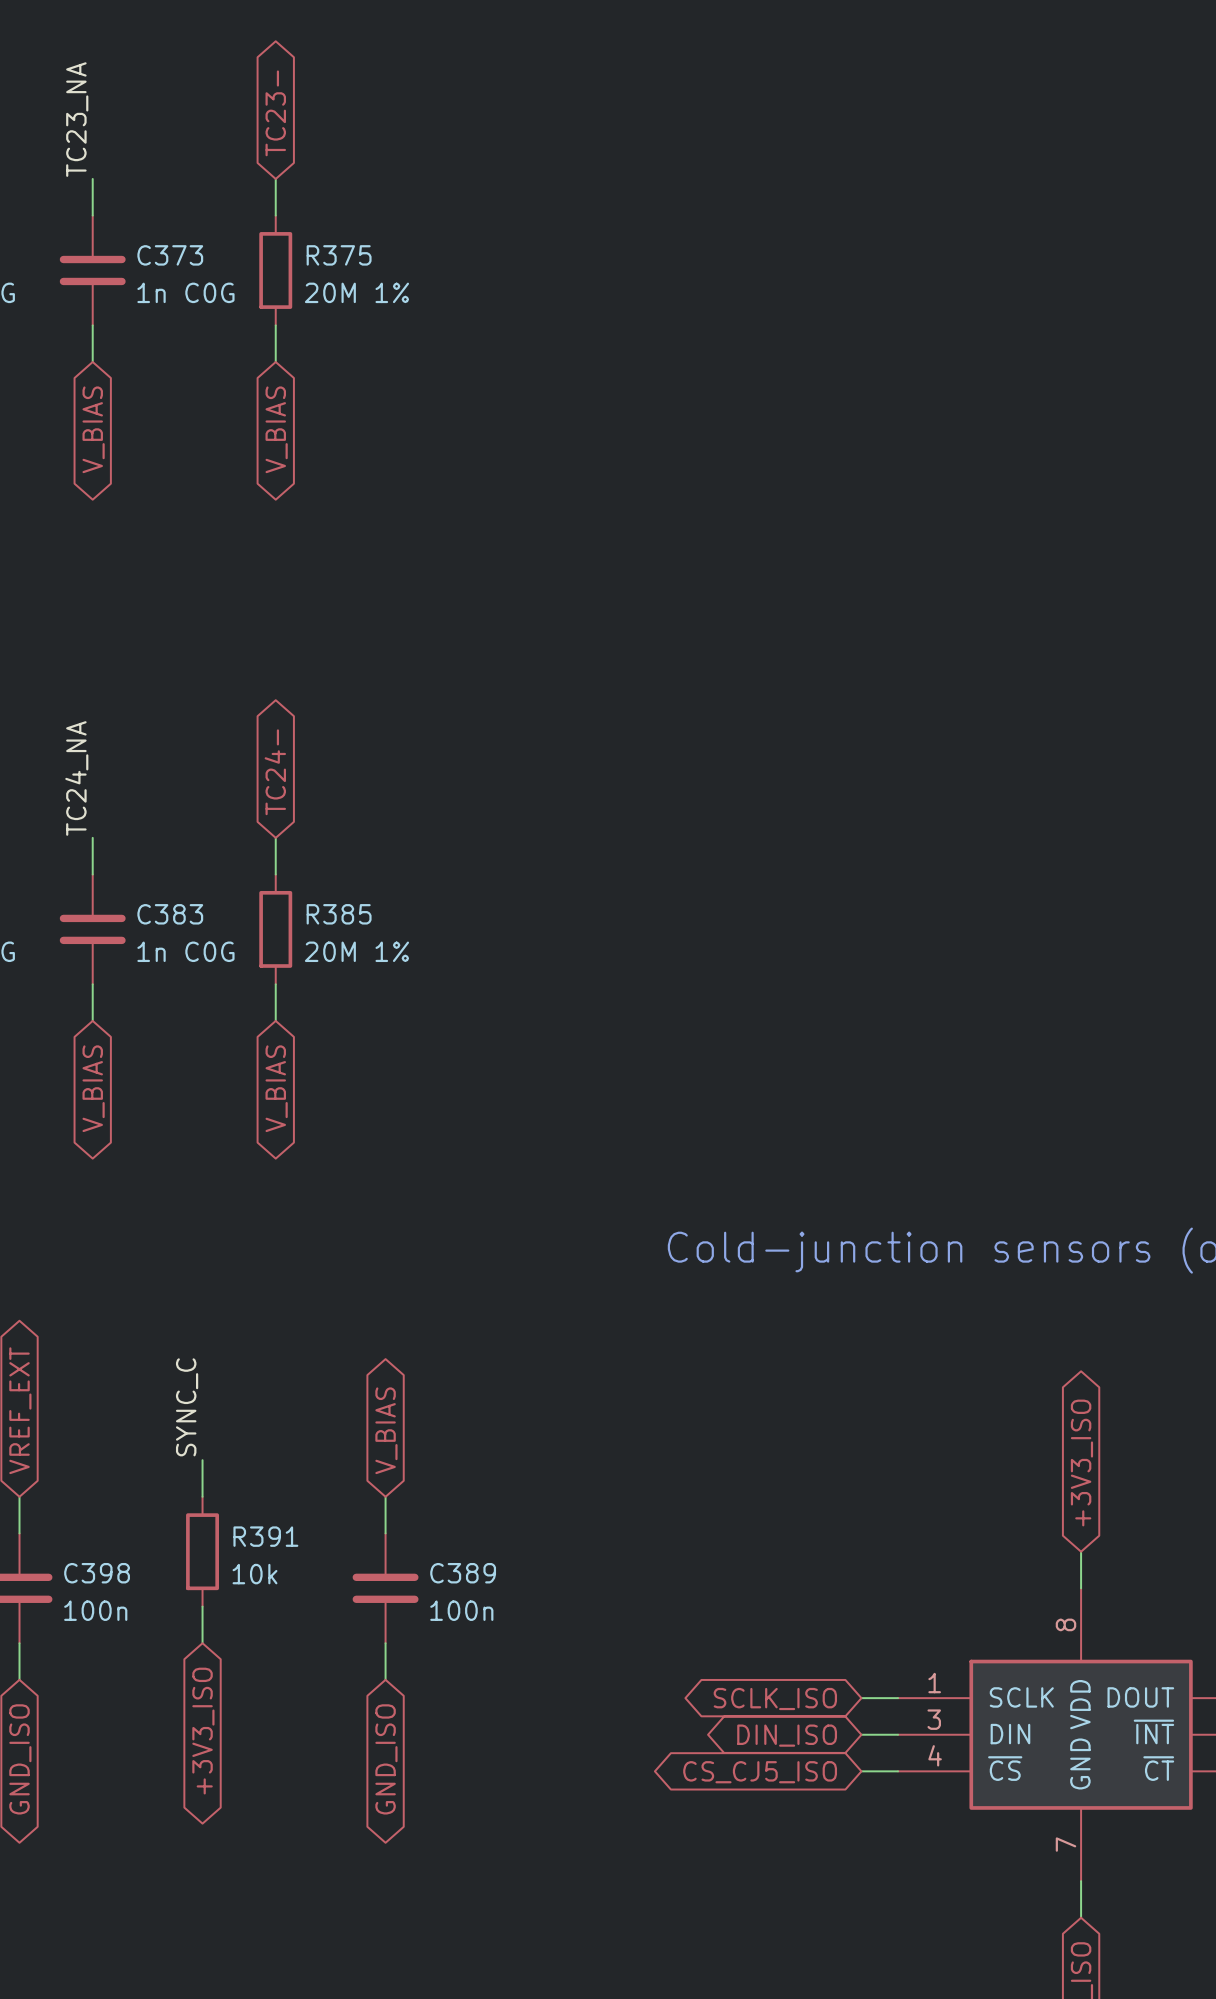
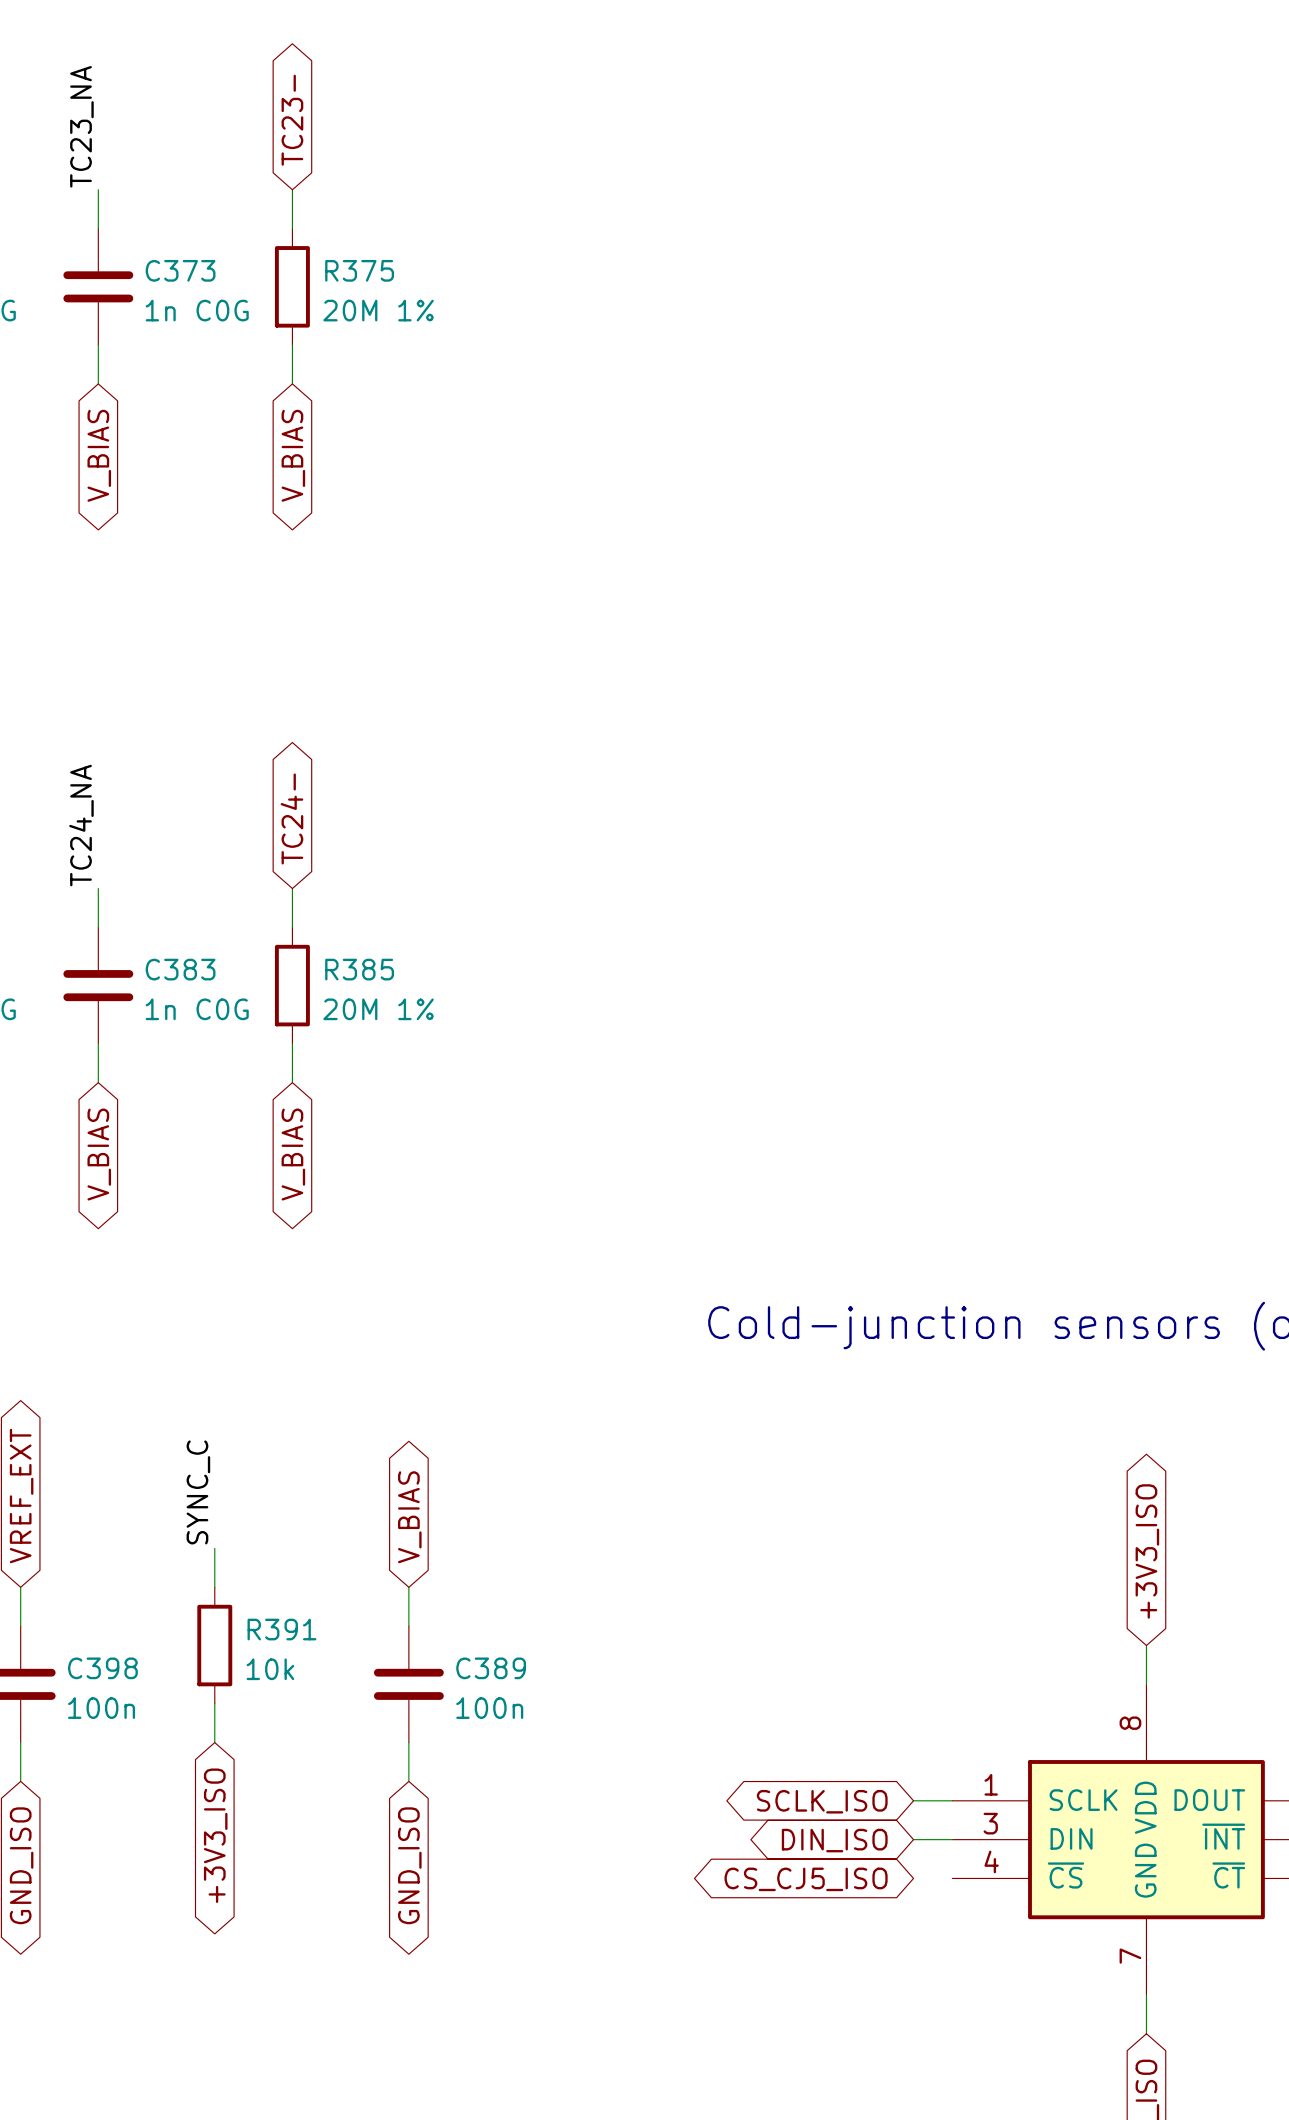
wire: (861, 1771) (898, 1771) -> none

